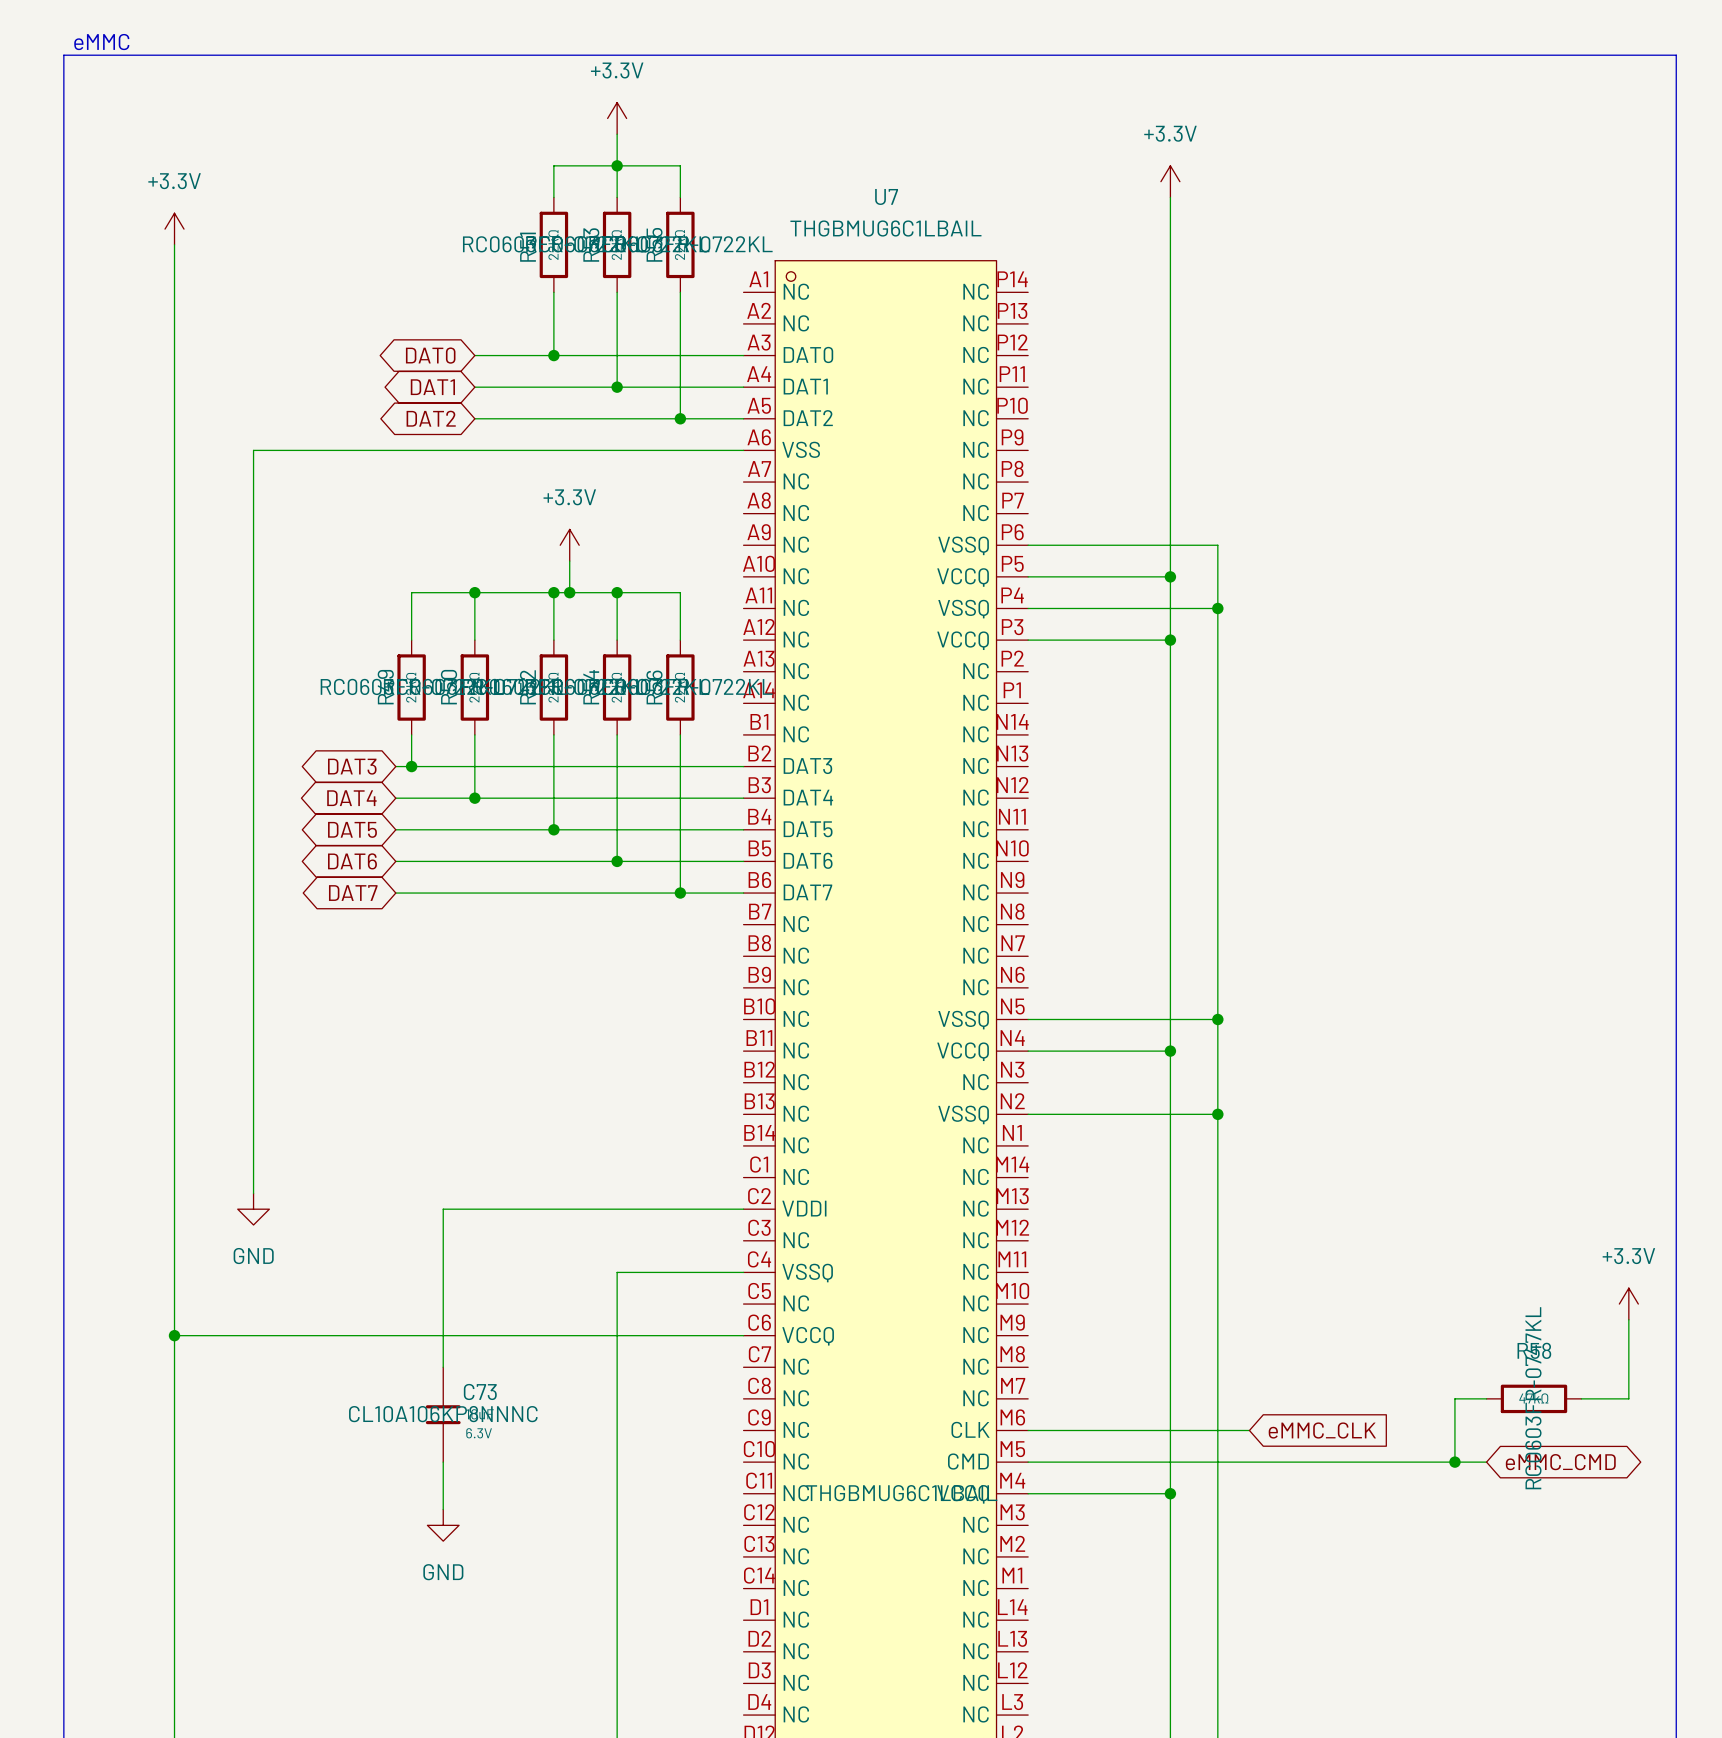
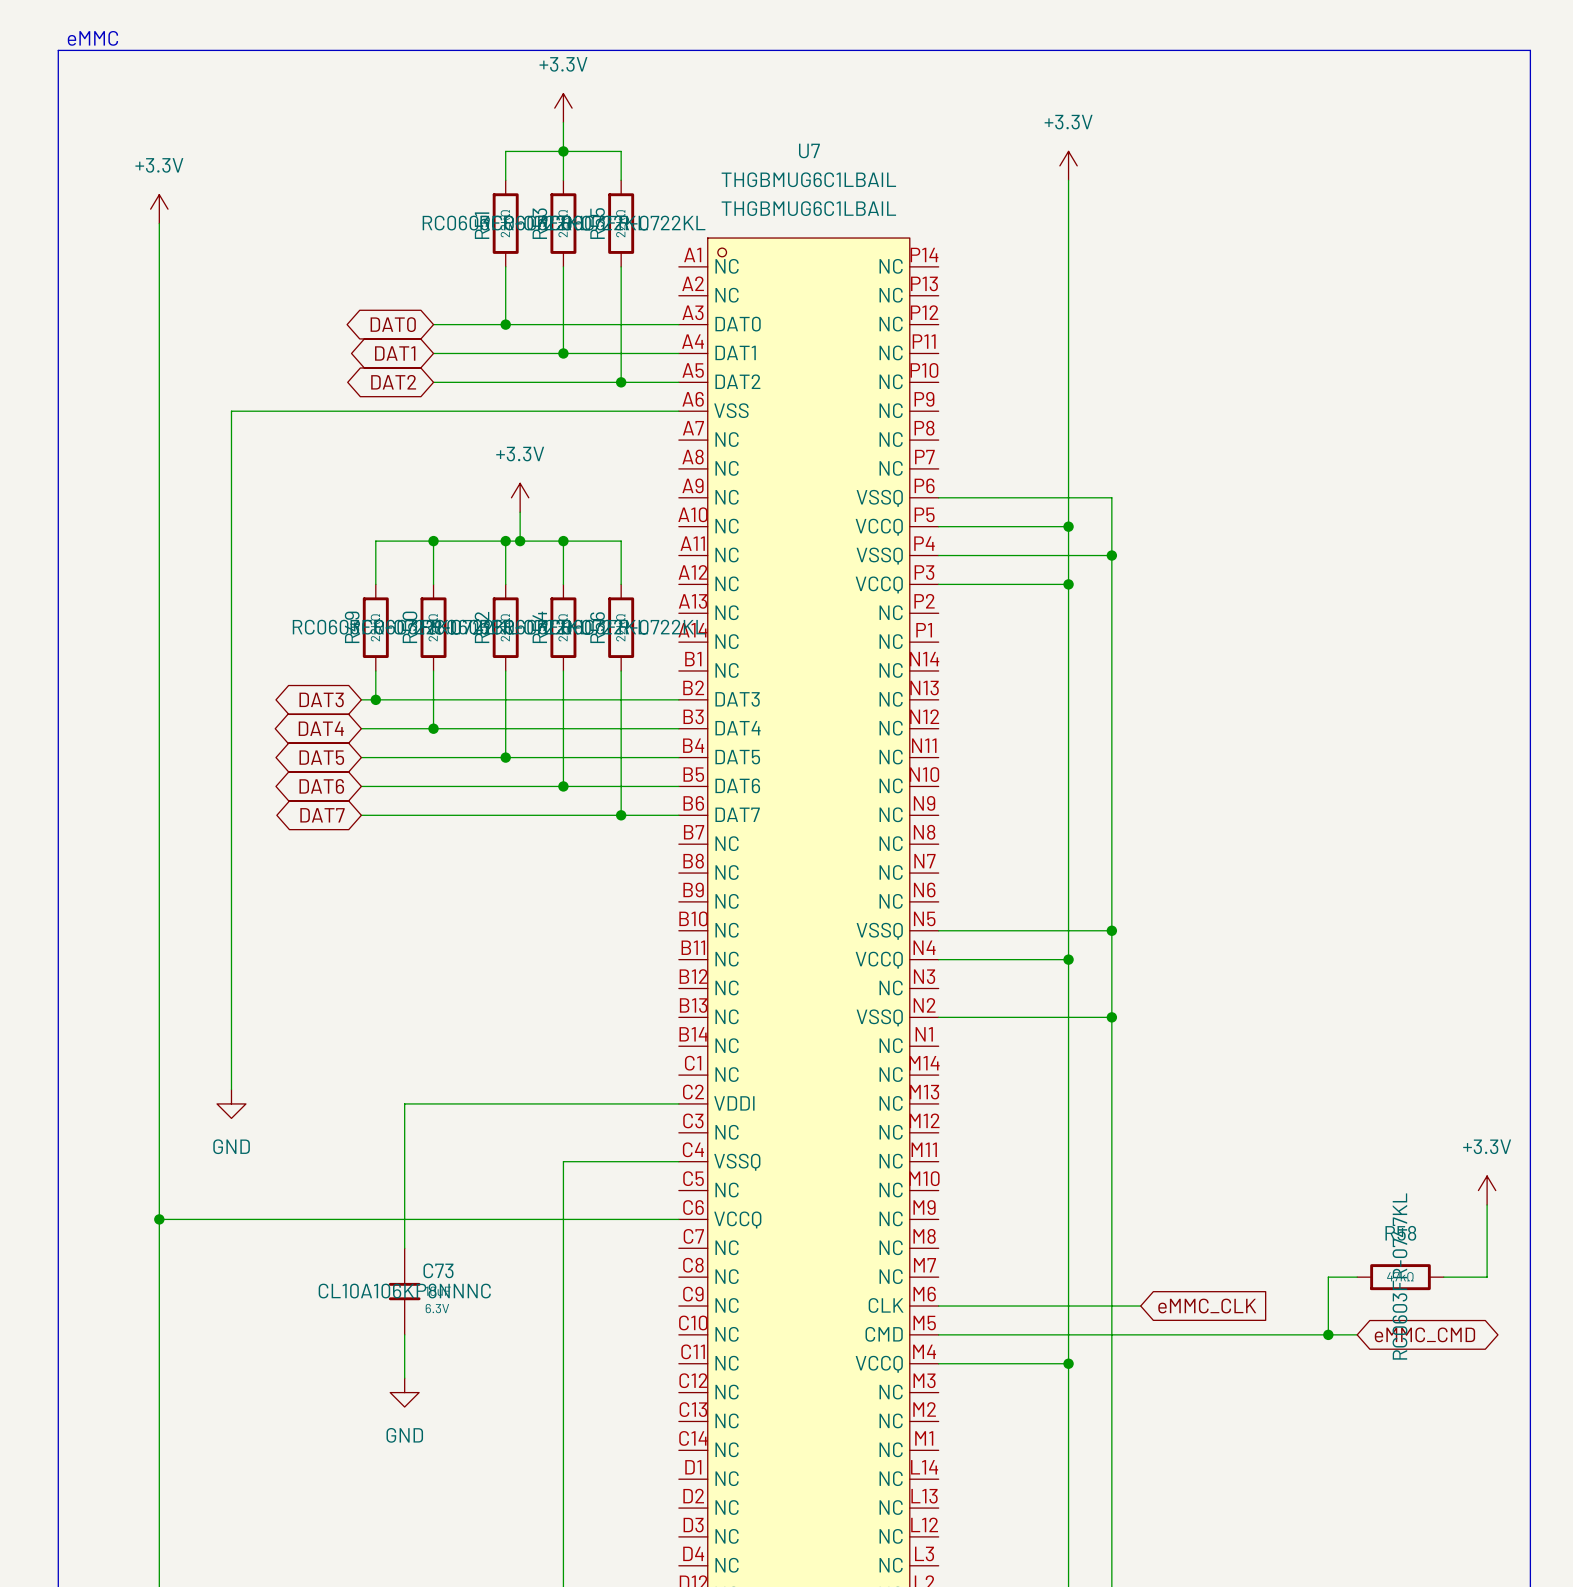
U7 name position: U7 (886, 196) -> U7 (809, 150)
U7 value position: THGBMUG6C1LBAIL (885, 228) -> THGBMUG6C1LBAIL (808, 179)
U7 text position: THGBMUG6C1LBAIL (901, 1493) -> THGBMUG6C1LBAIL (808, 208)

